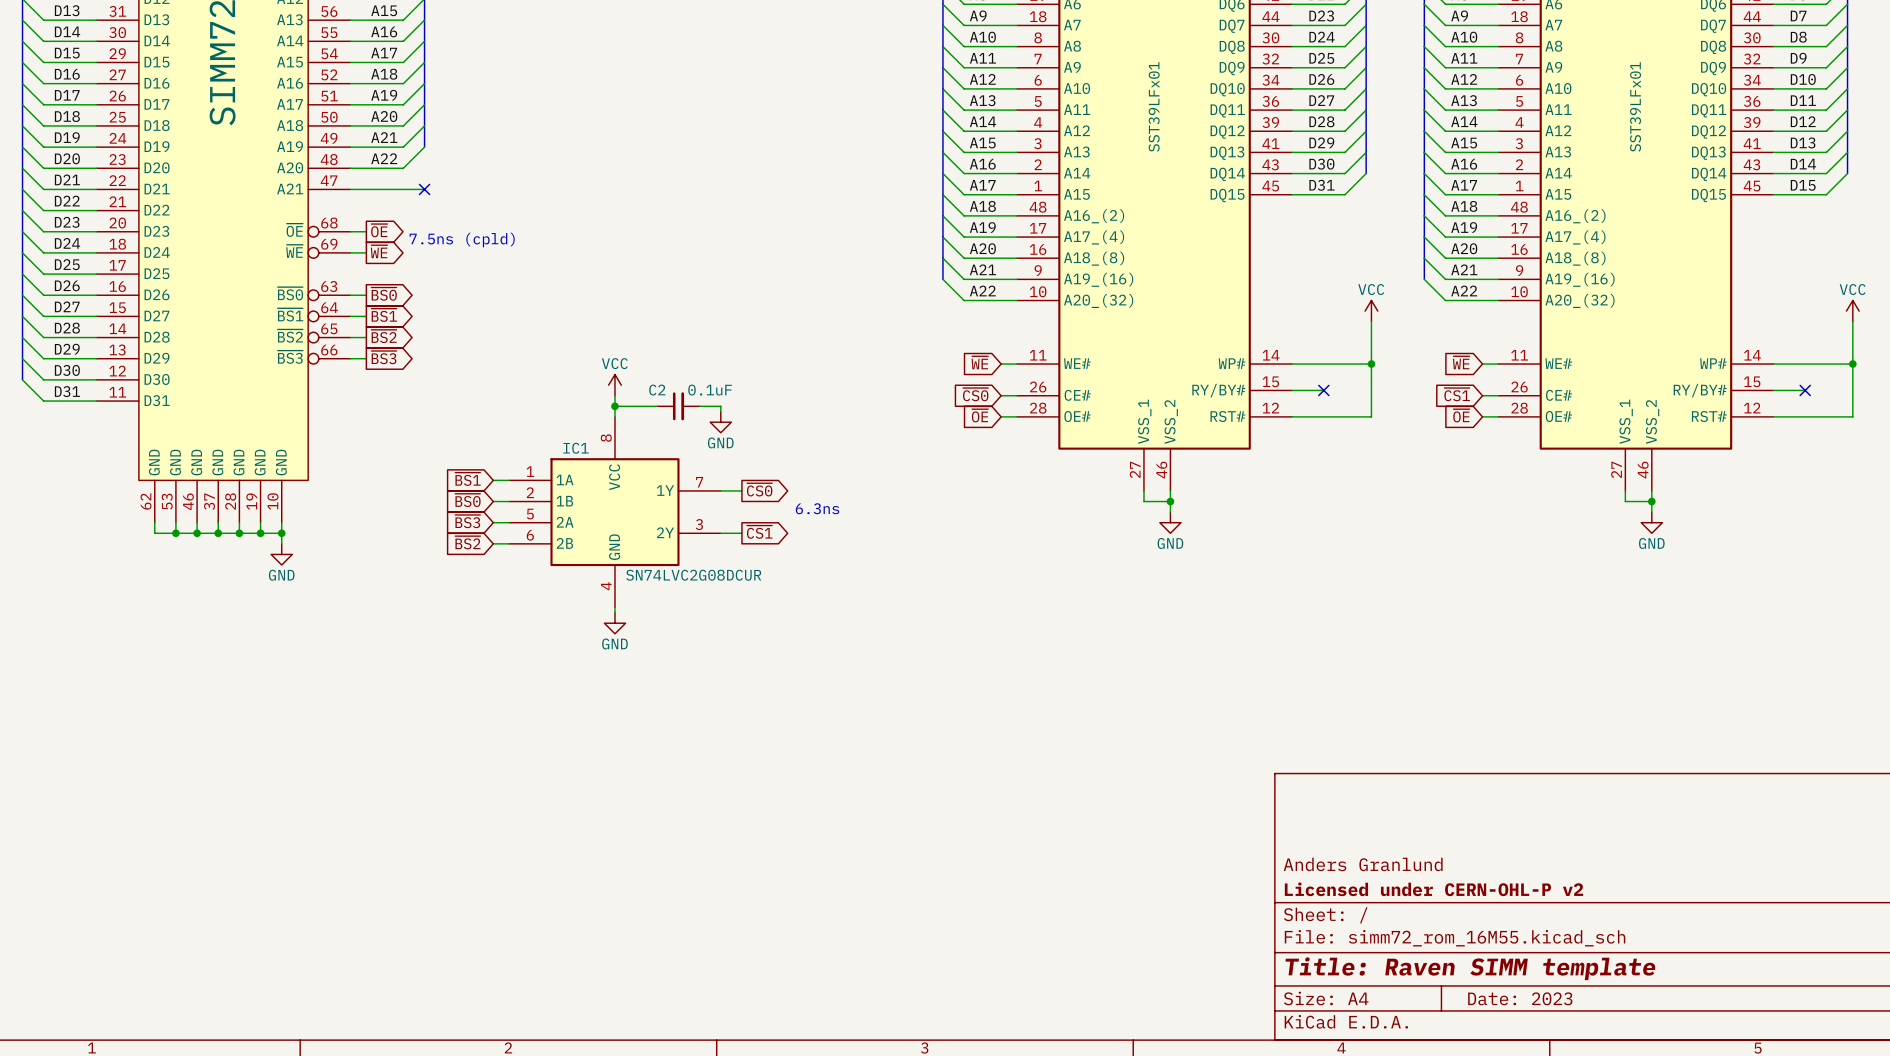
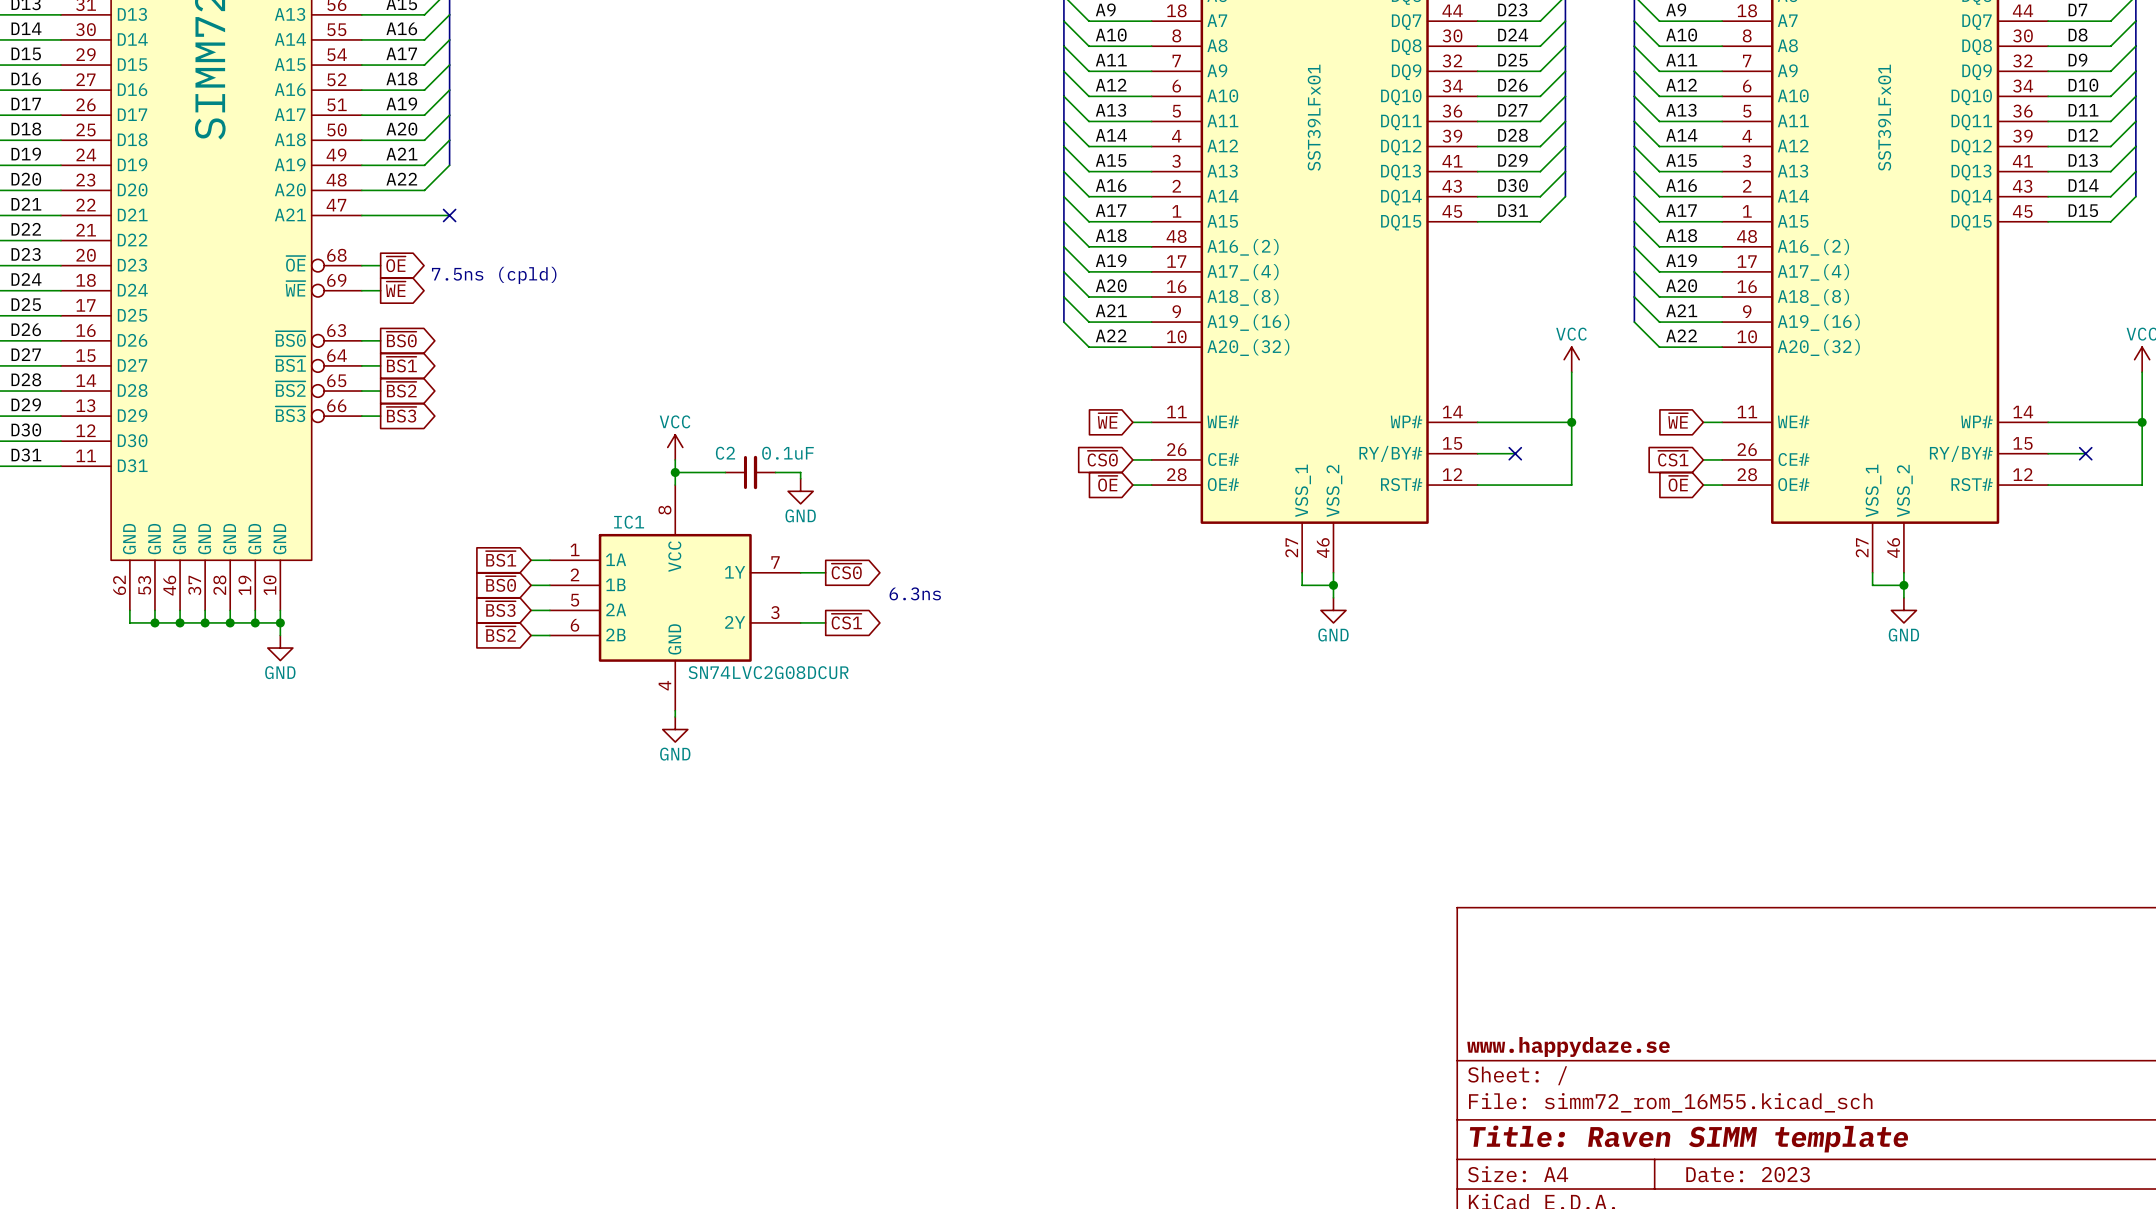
title block: Anders Granlund (1363, 864) -> none
title block: Licensed under CERN-OHL-P v2 (1433, 889) -> www.happydaze.se (1568, 1046)

